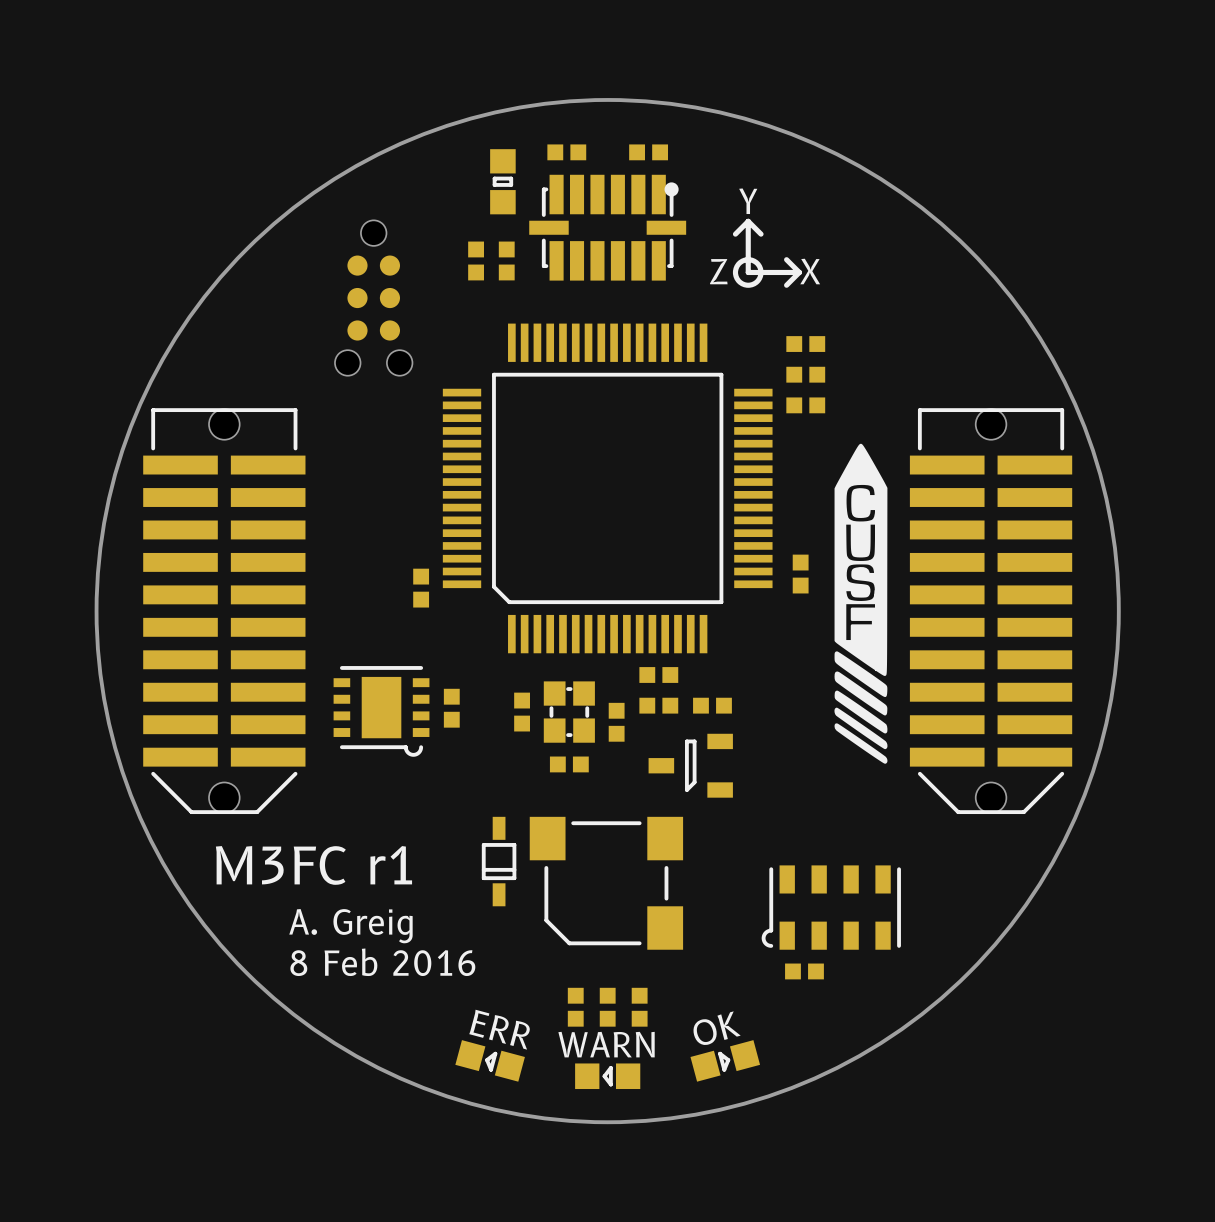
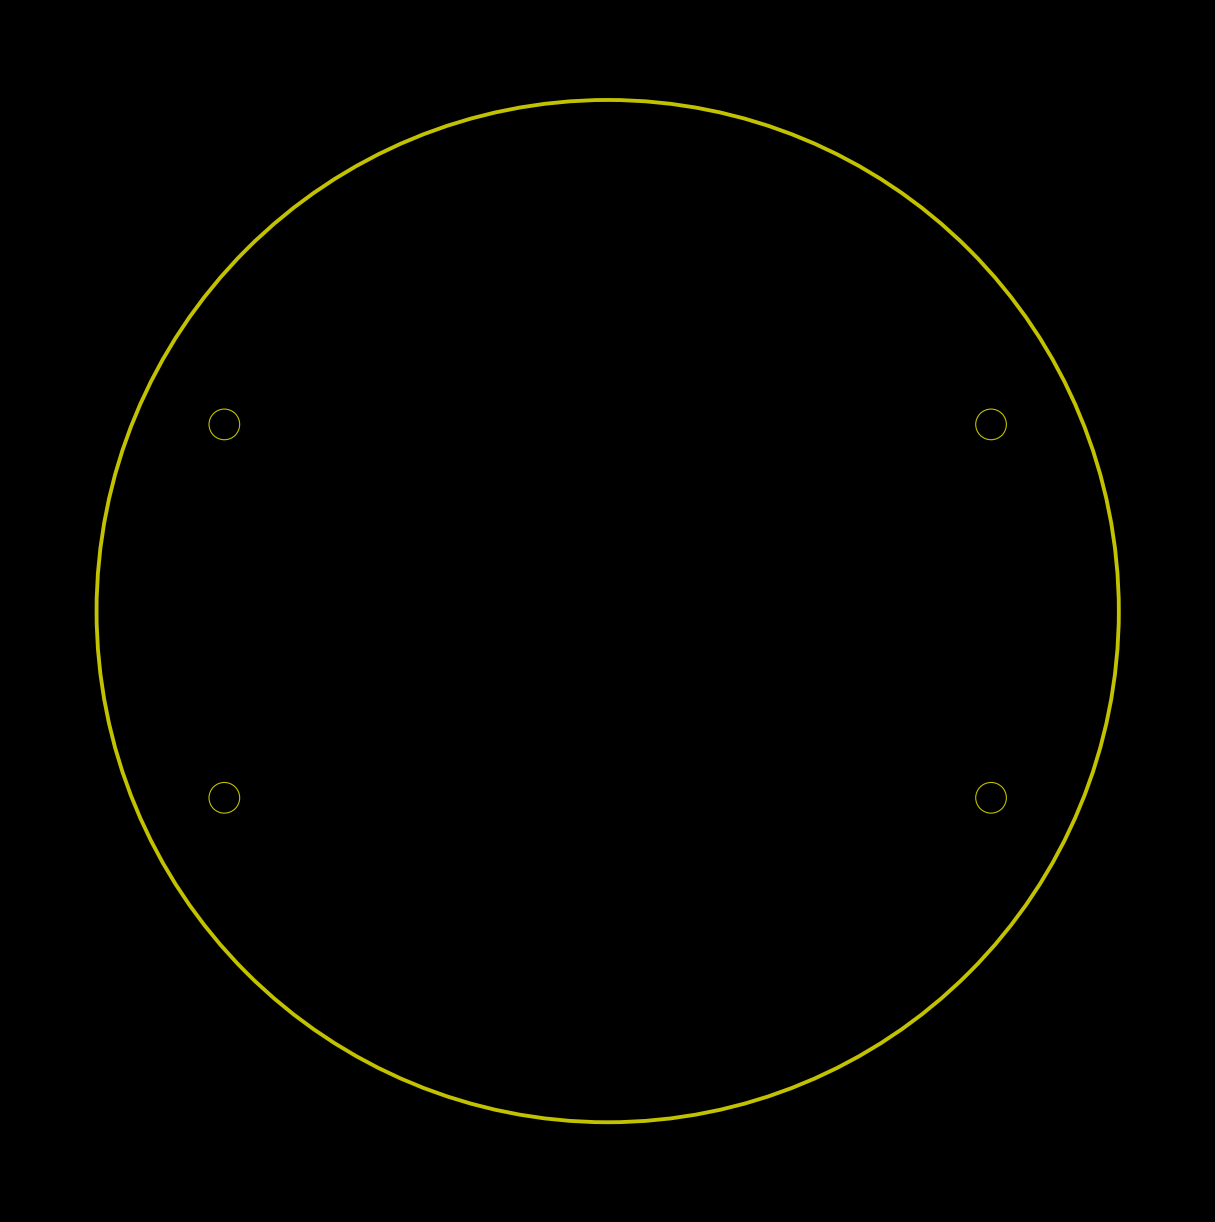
part: (566, 152) -> none
part: (648, 152) -> none
part: (502, 181) -> none
text: Y (748, 201) -> none
line: (748, 221) (761, 234) -> none
line: (748, 221) (735, 234) -> none
line: (748, 221) (748, 272) (799, 272) -> none
part: (607, 227) -> none
drawing: [732, 257, 764, 288] -> none
line: (786, 259) (799, 272) -> none
part: (476, 260) -> none
part: (506, 260) -> none
text: Z (718, 271) -> none
text: X (810, 271) -> none
line: (799, 272) (786, 285) -> none
part: (373, 298) -> none
part: (805, 344) -> none
part: (805, 374) -> none
part: (805, 405) -> none
drawing: [834, 443, 888, 764] -> none
part: (607, 488) -> none
part: (800, 574) -> none
part: (421, 588) -> none
part: (224, 611) -> none
part: (991, 611) -> none
part: (658, 674) -> none
part: (658, 705) -> none
part: (712, 705) -> none
part: (451, 708) -> none
part: (381, 711) -> none
part: (522, 712) -> none
part: (569, 712) -> none
part: (616, 722) -> none
part: (569, 764) -> none
part: (690, 765) -> none
part: (499, 861) -> none
text: M3FC r1 (313, 865) -> none
part: (606, 883) -> none
part: (831, 907) -> none
text: A. Greig (350, 926) -> none
text: 8 Feb 2016 (382, 962) -> none
part: (804, 971) -> none
part: (575, 1007) -> none
part: (607, 1007) -> none
part: (639, 1007) -> none
text: OK (717, 1028) -> none
text: ERR (499, 1029) -> none
text: WARN (606, 1044) -> none
part: (490, 1060) -> none
part: (725, 1060) -> none
part: (607, 1076) -> none

